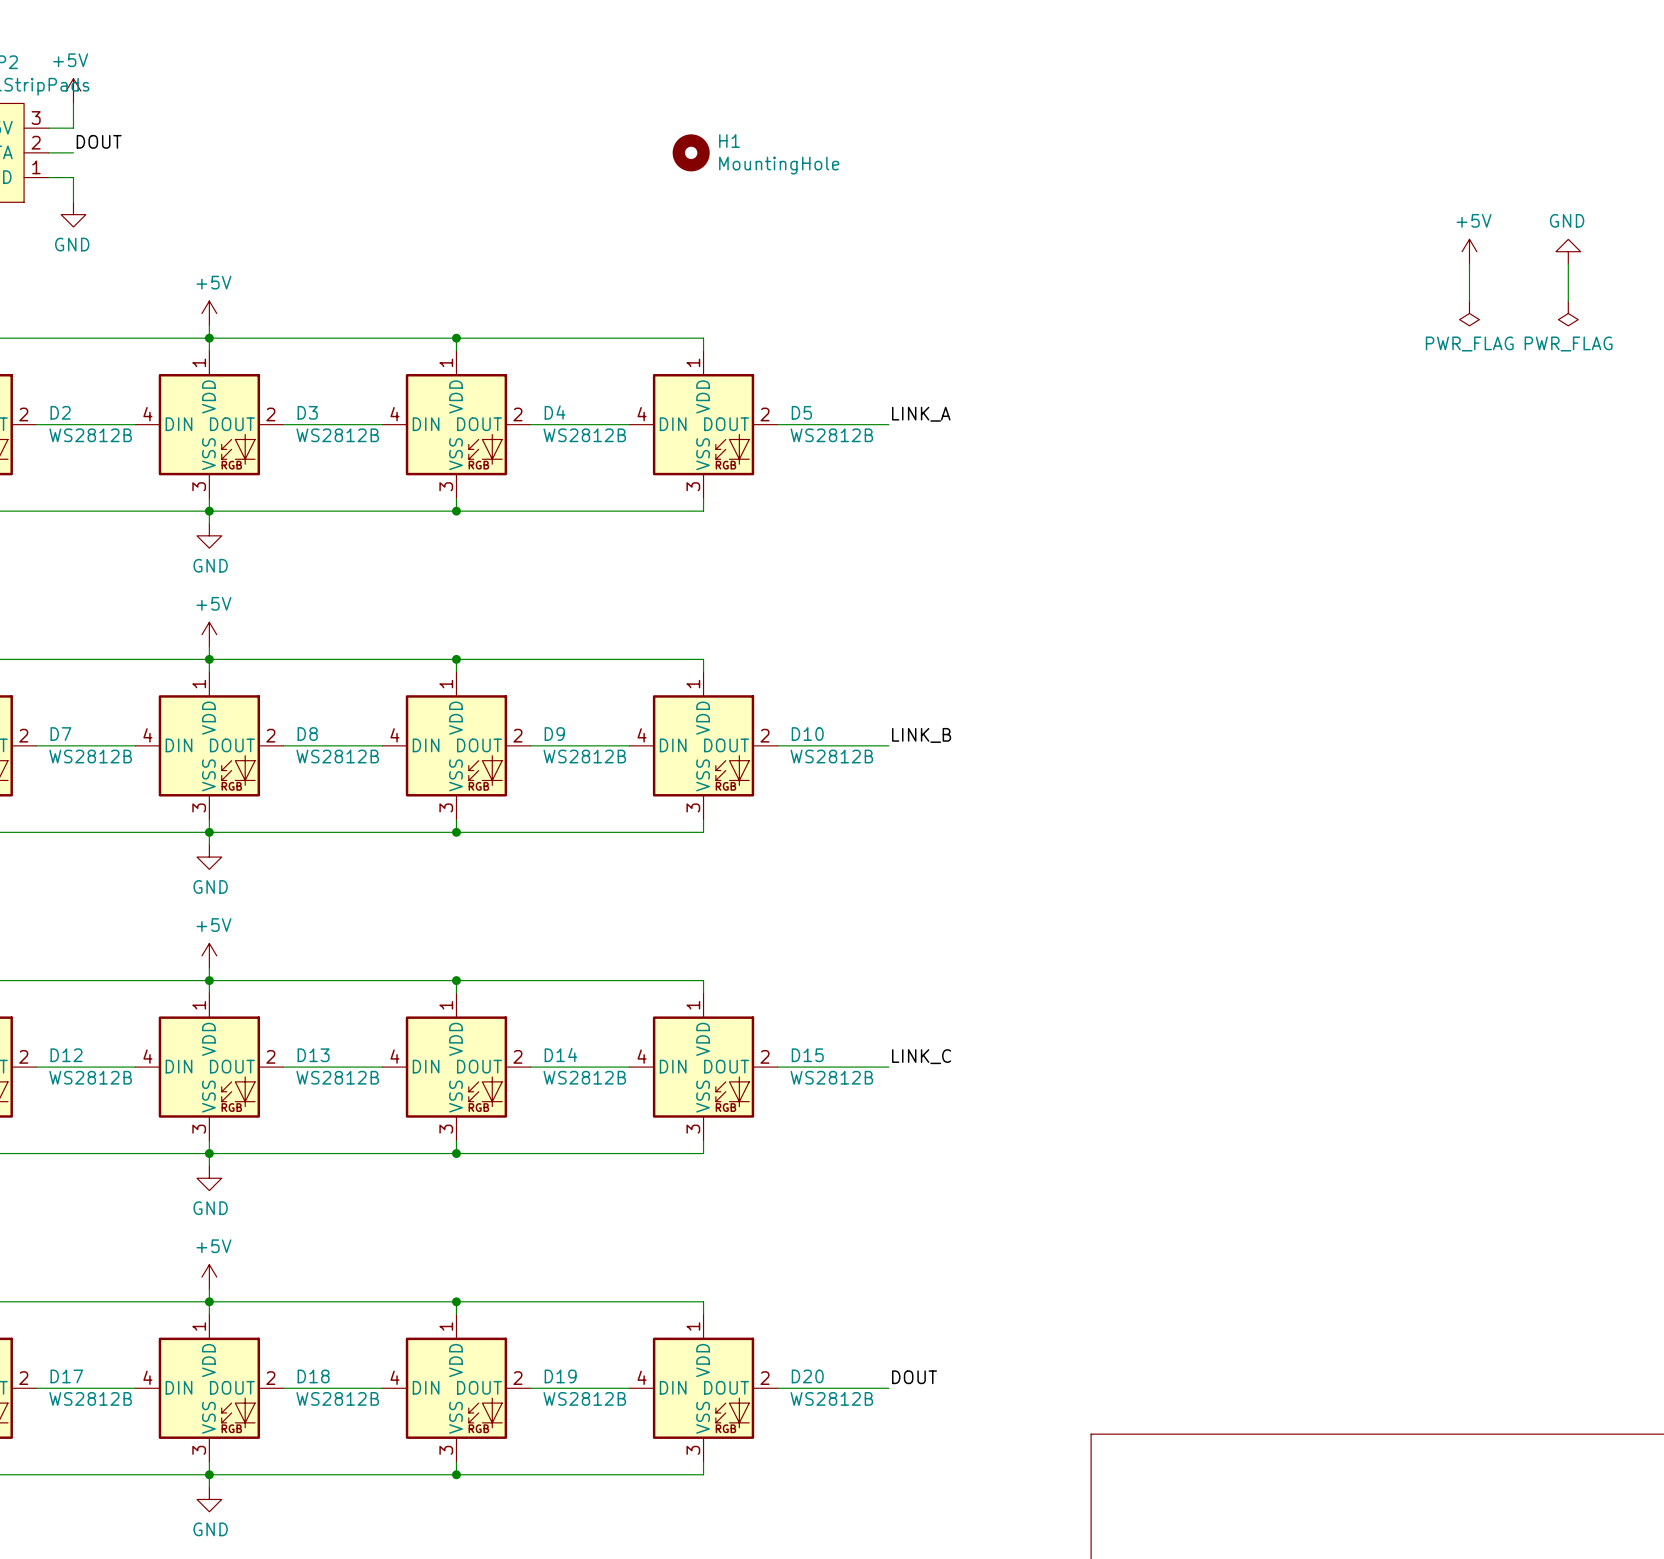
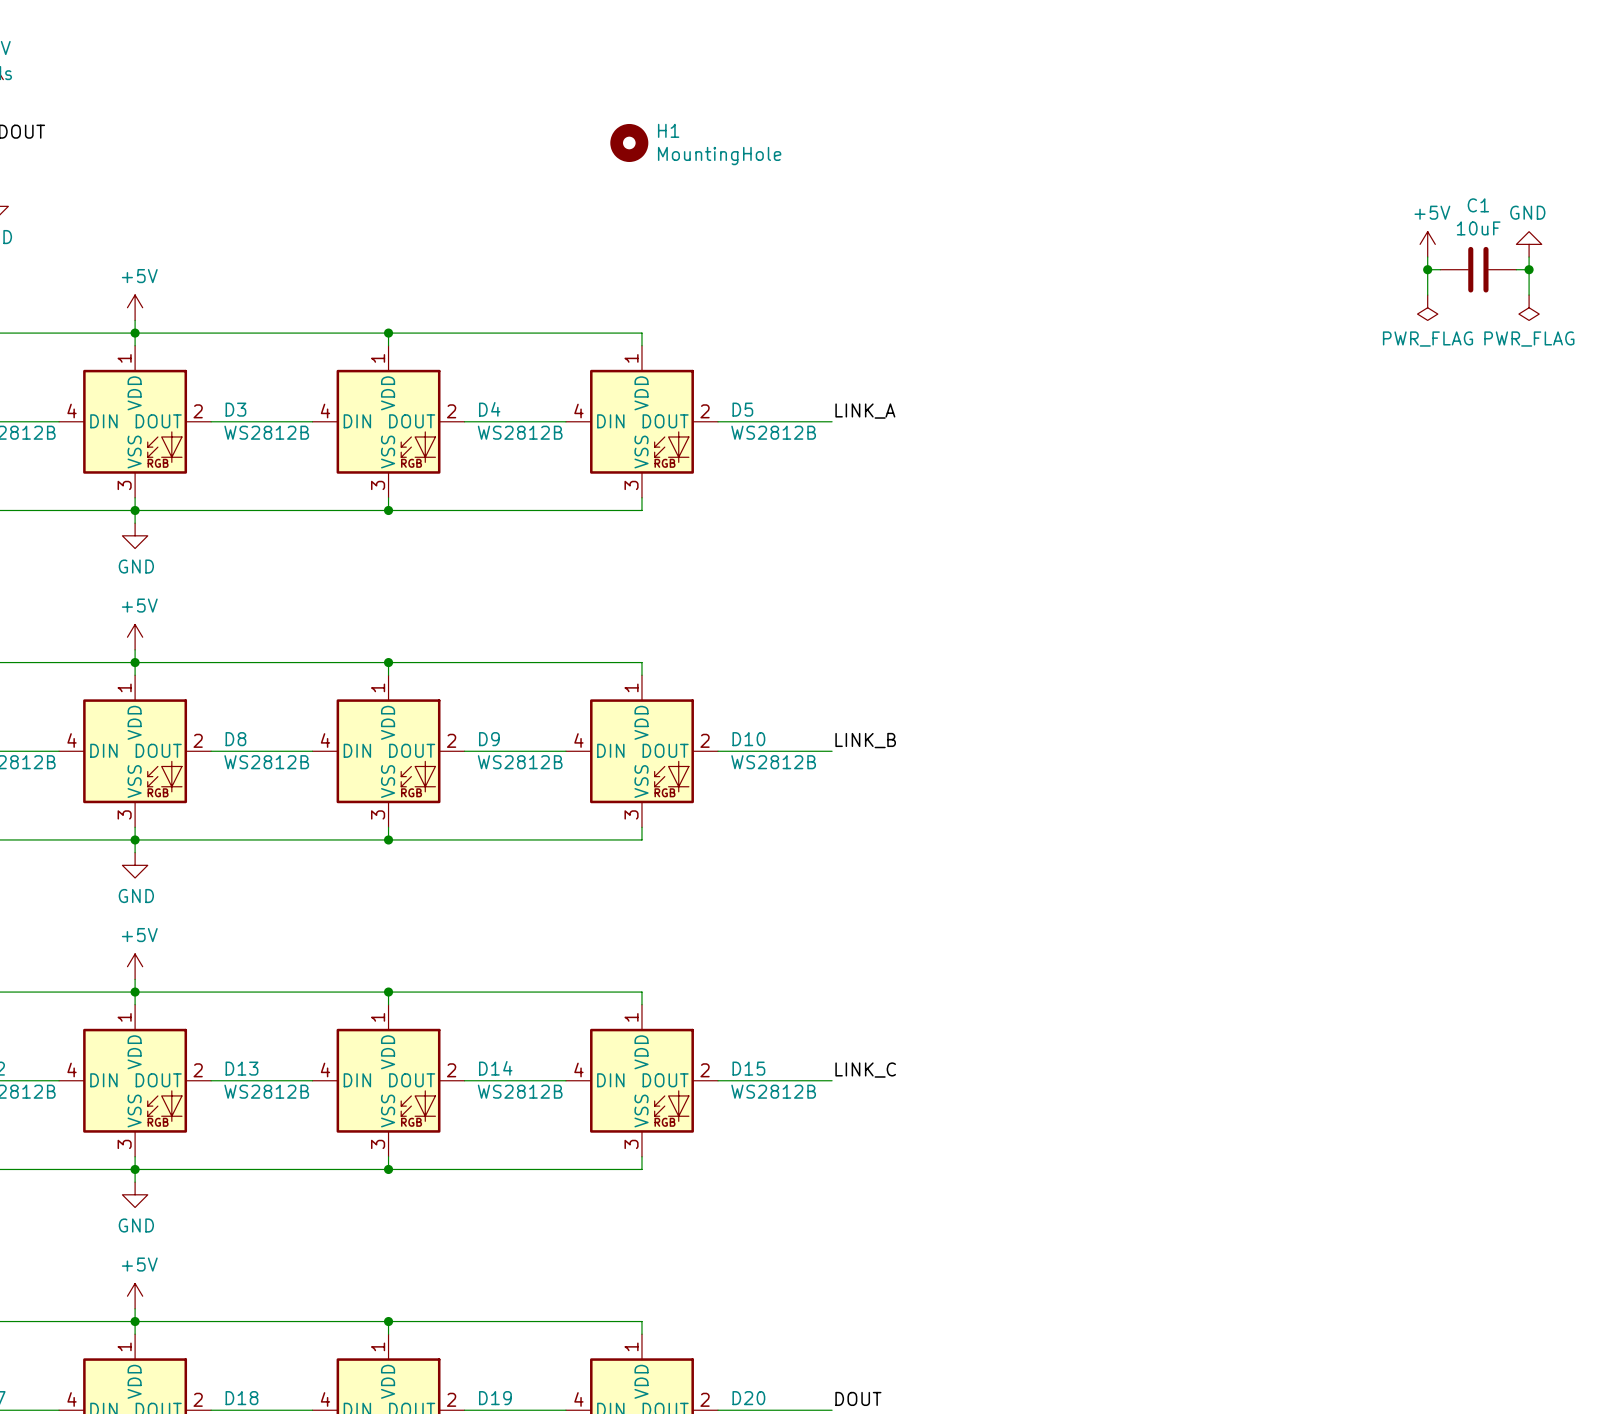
wire: none -> (1427, 269) (1440, 269)
junction: none -> (1427, 269)
C1: none -> 10uF (1478, 269)
wire: none -> (1516, 269) (1529, 269)
junction: none -> (1529, 269)

